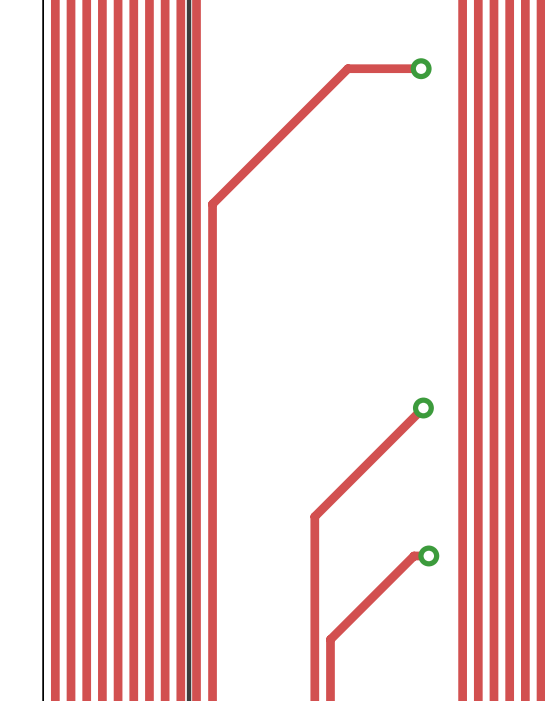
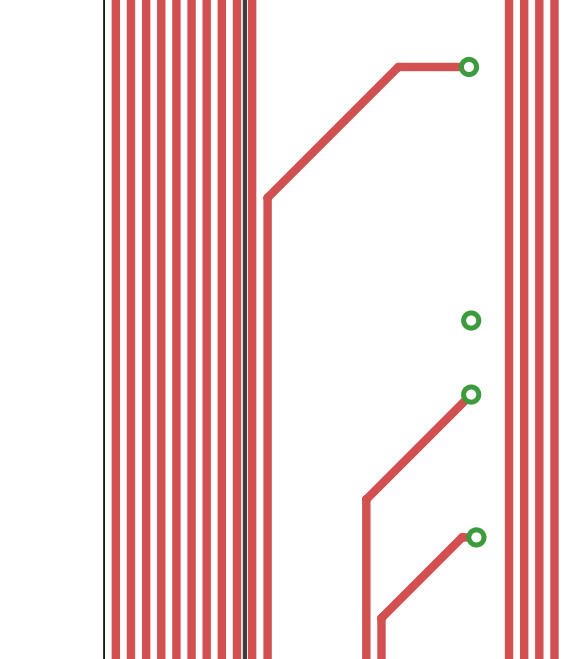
via: none -> (471, 320)

